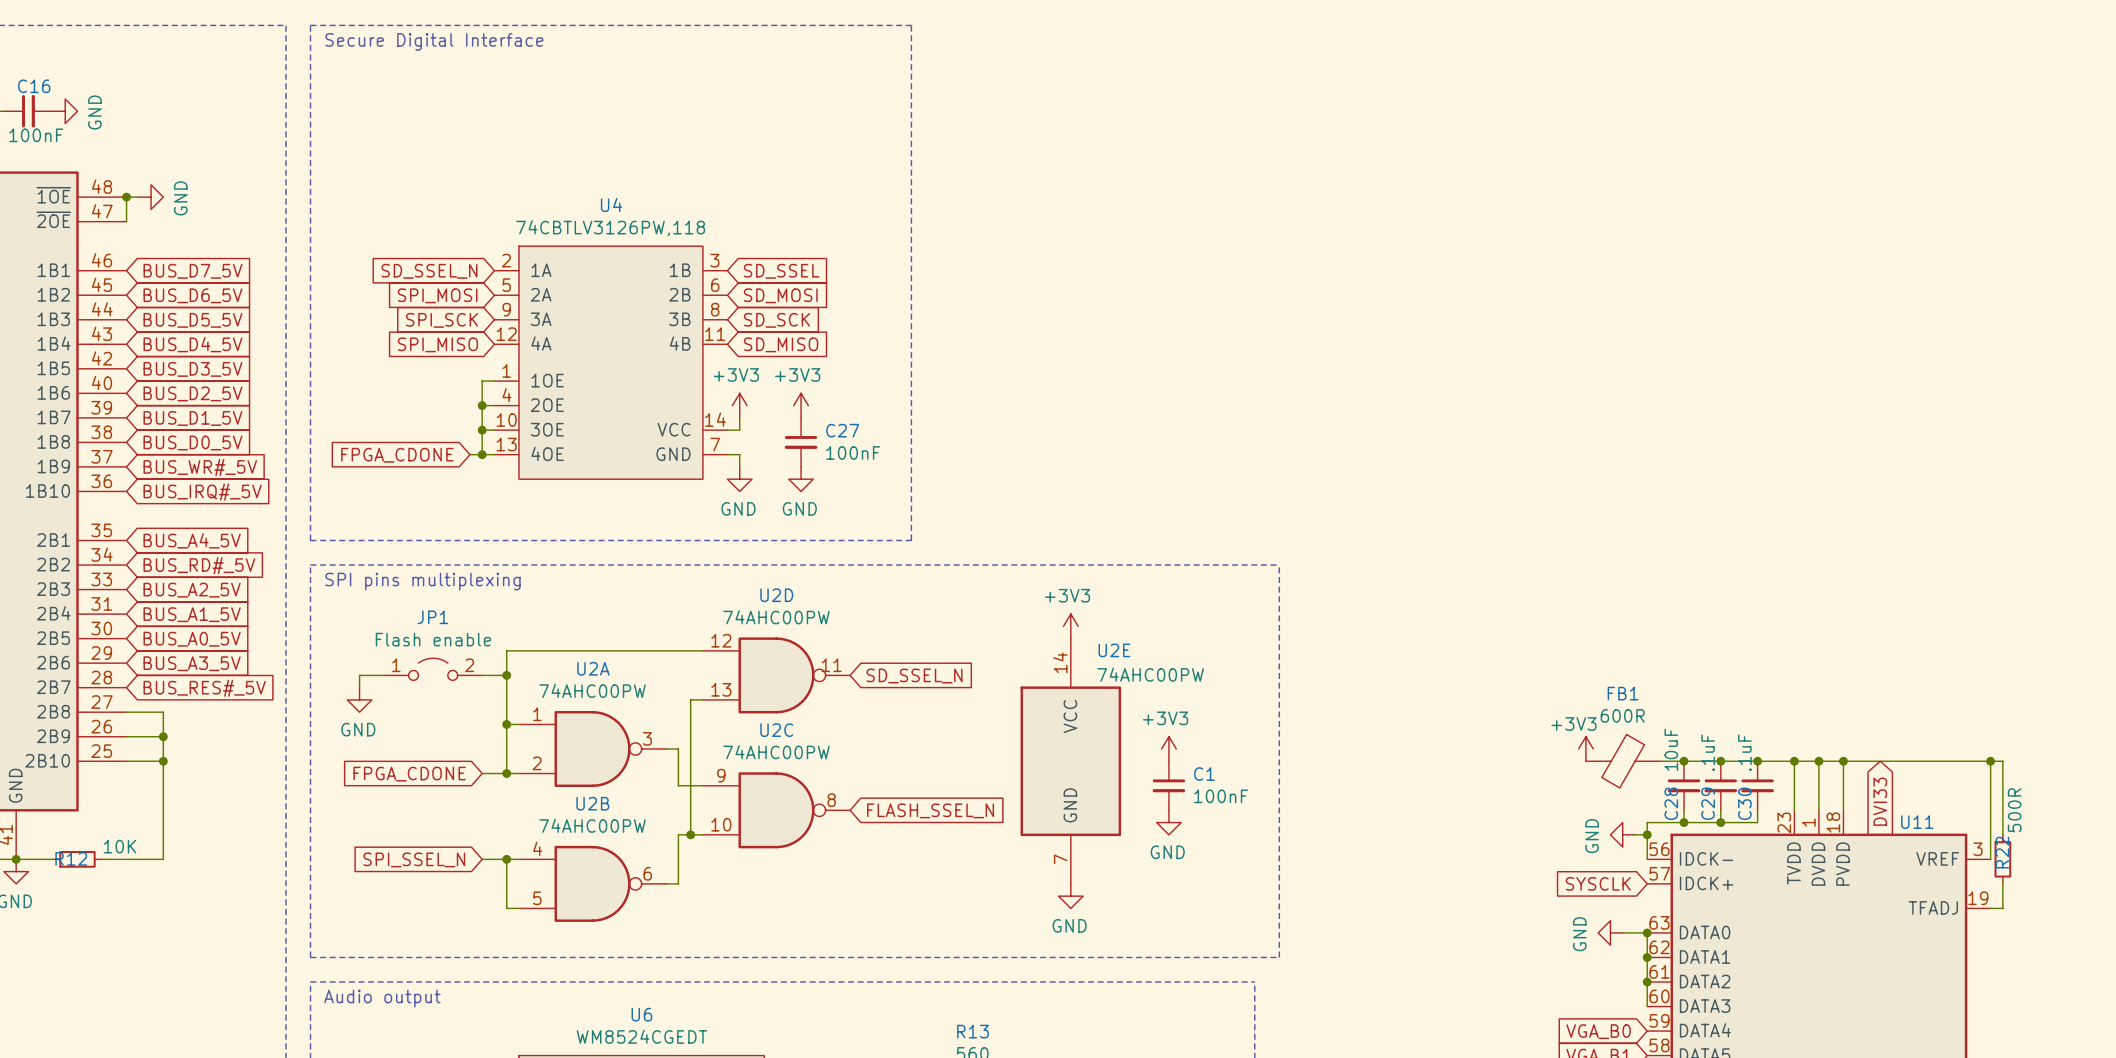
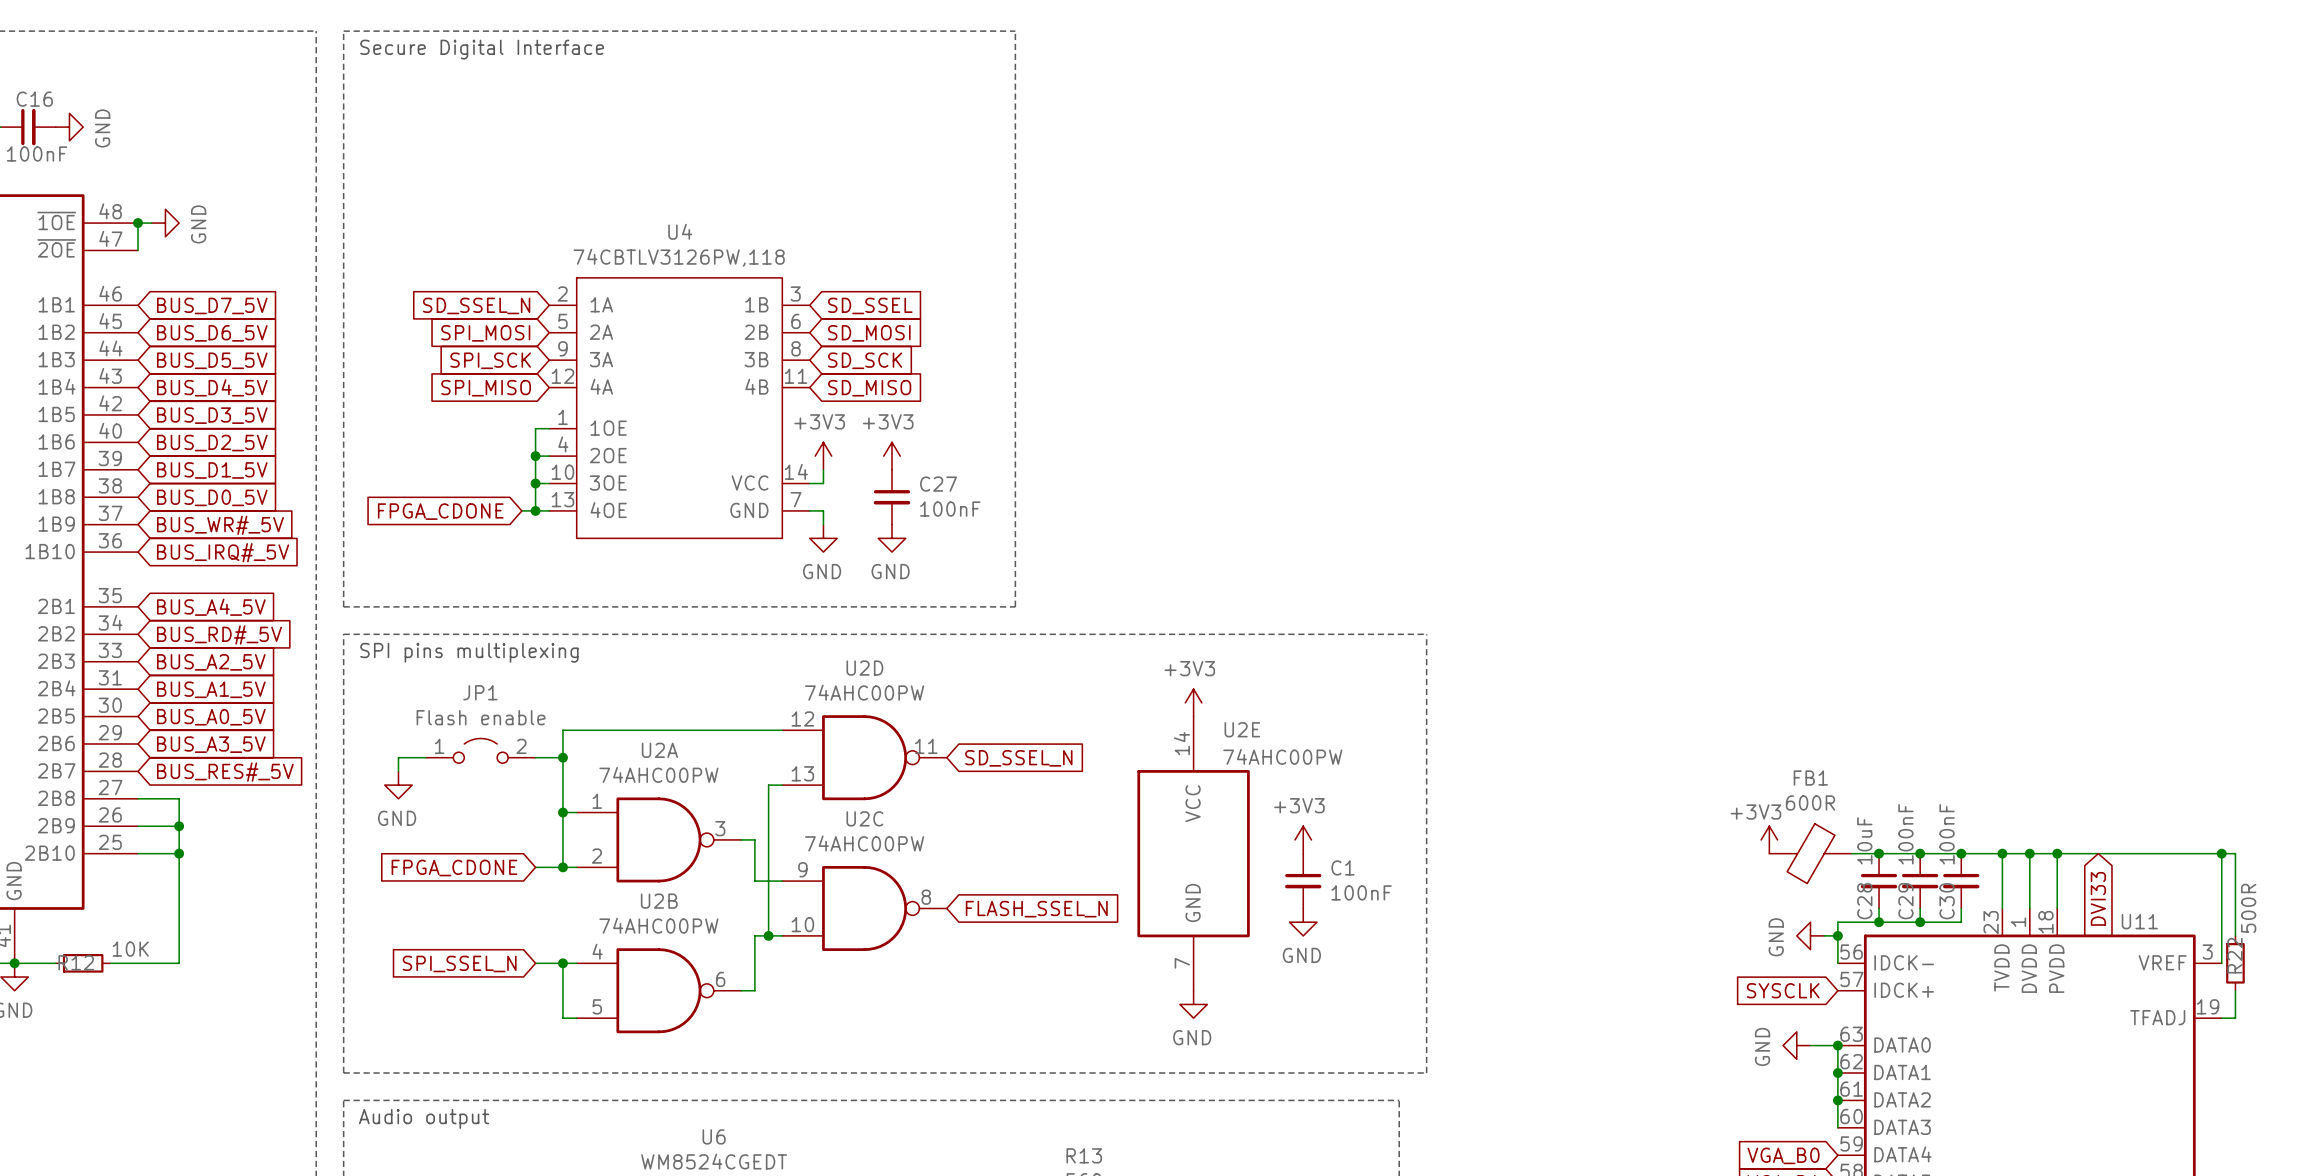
C29 value: .1uF (1708, 752) -> 100nF (1905, 834)
C30 value: .1uF (1744, 752) -> 100nF (1947, 834)

